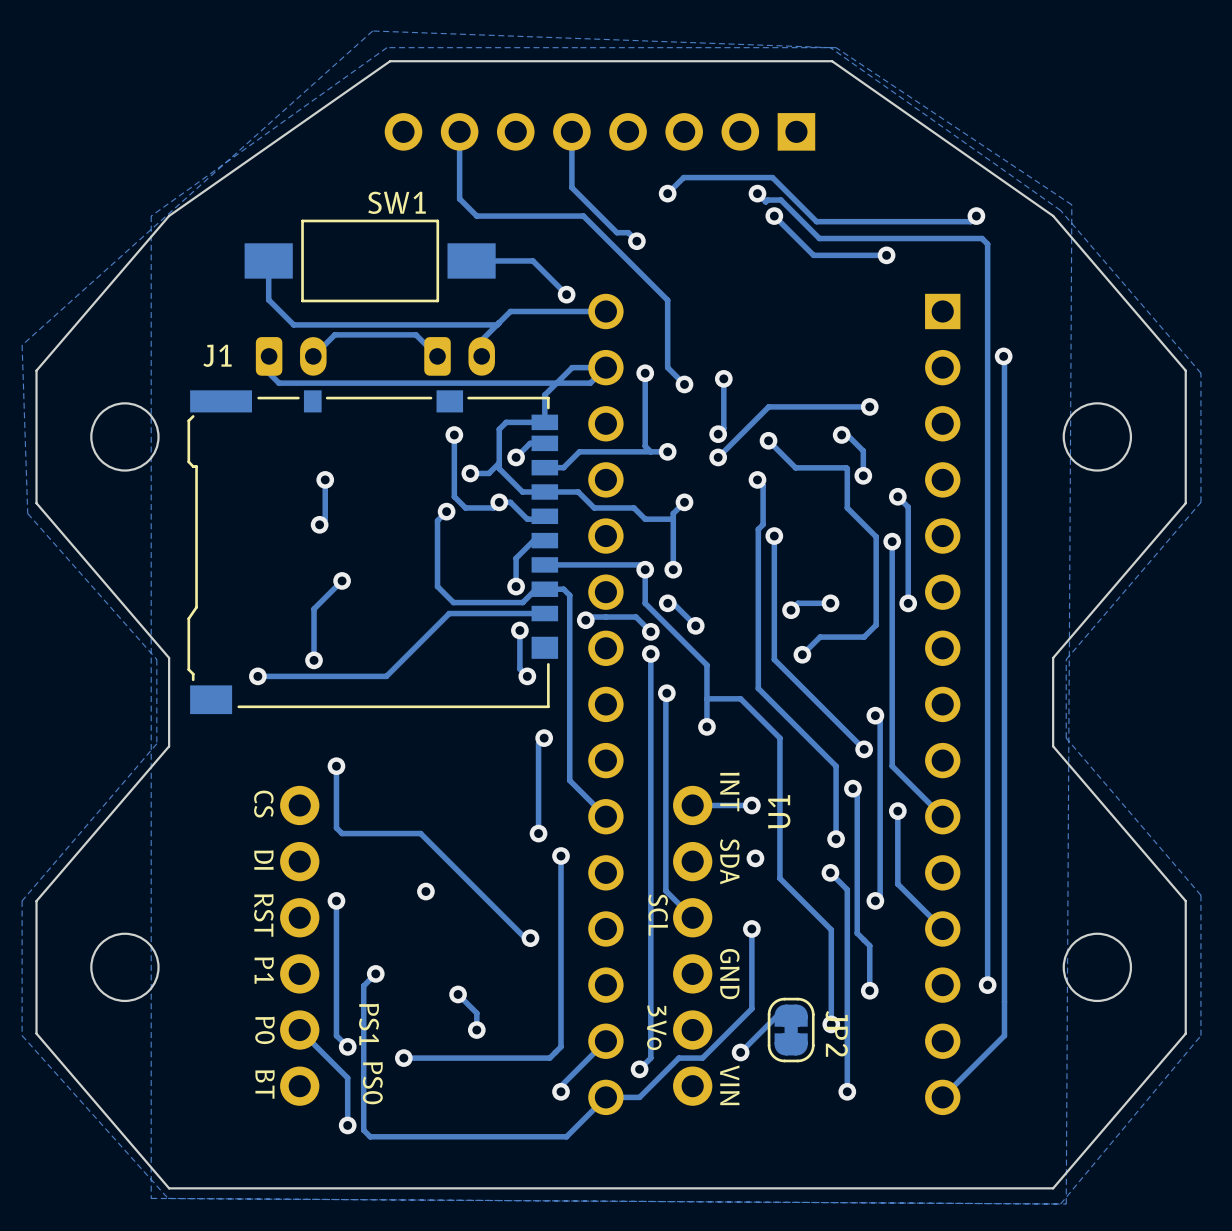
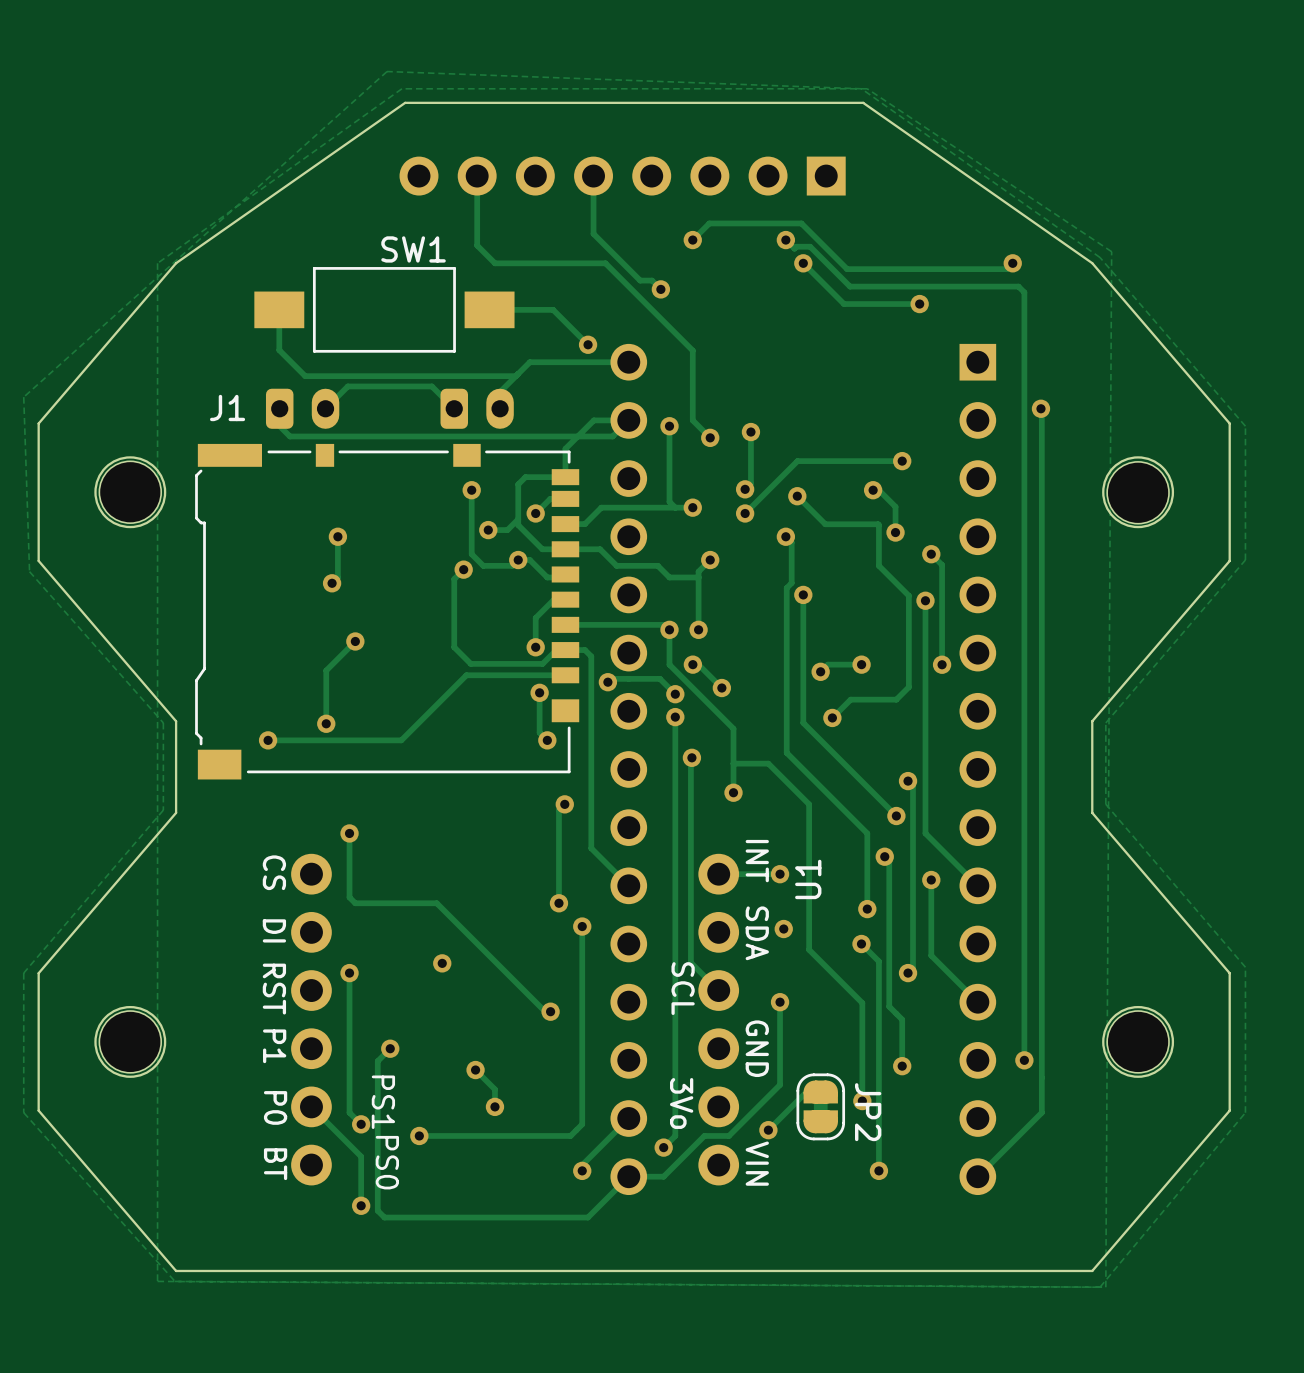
part: none -> (130, 492)
part: none -> (1138, 492)
part: none -> (130, 1041)
part: none -> (1138, 1041)

